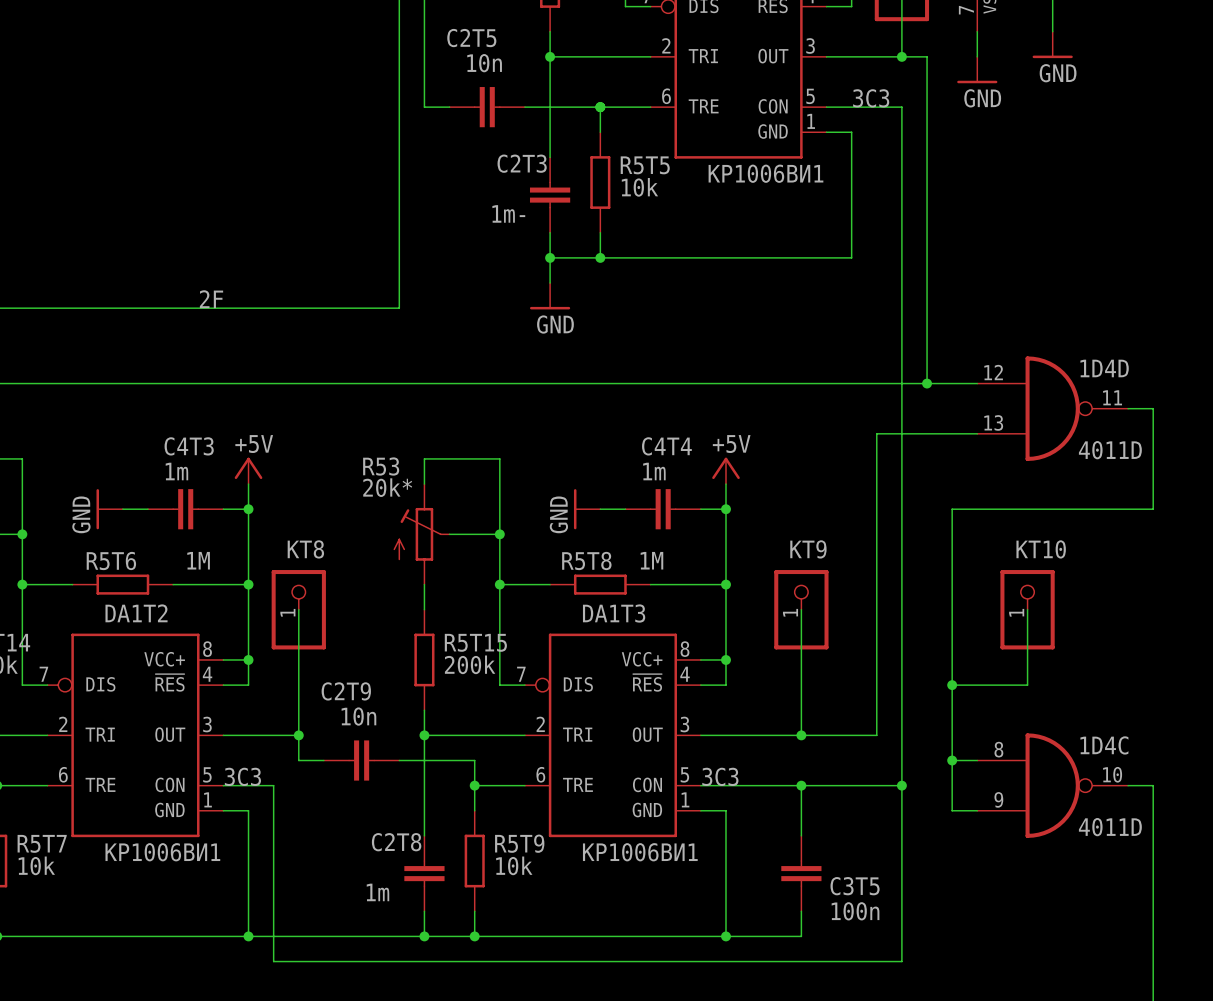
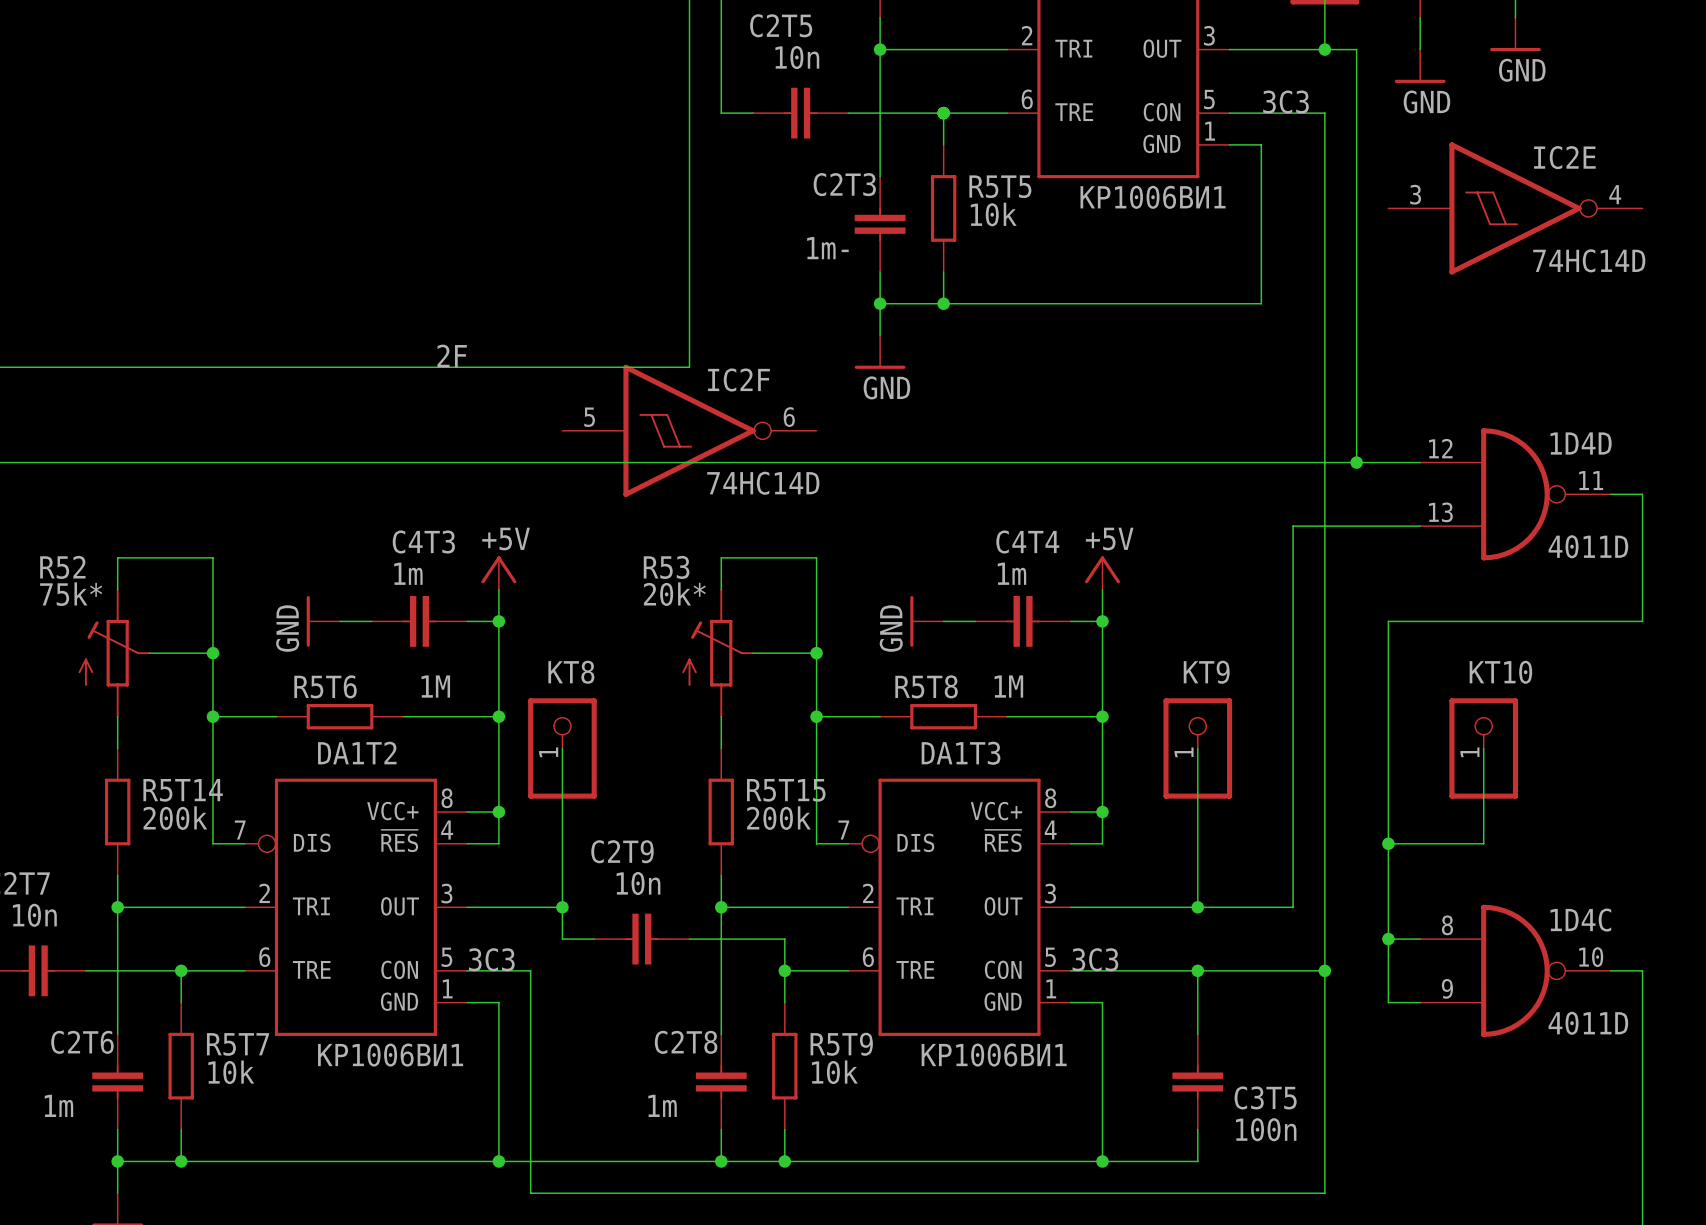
IC2E: none -> 74HC14D (1515, 208)
IC2F: none -> 74HC14D (689, 430)

